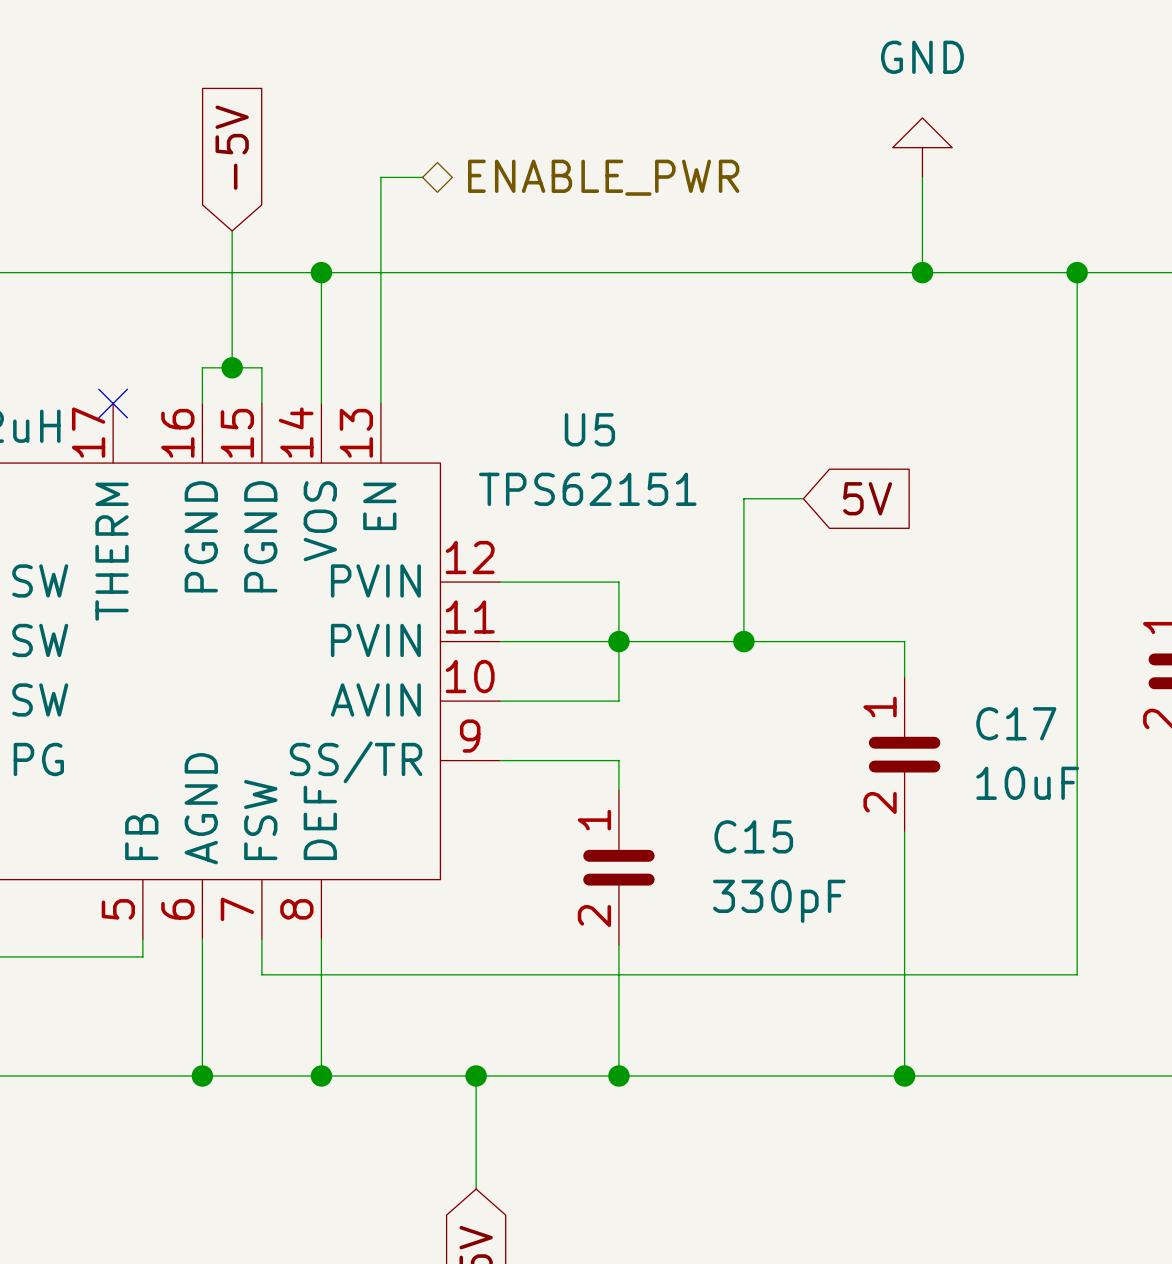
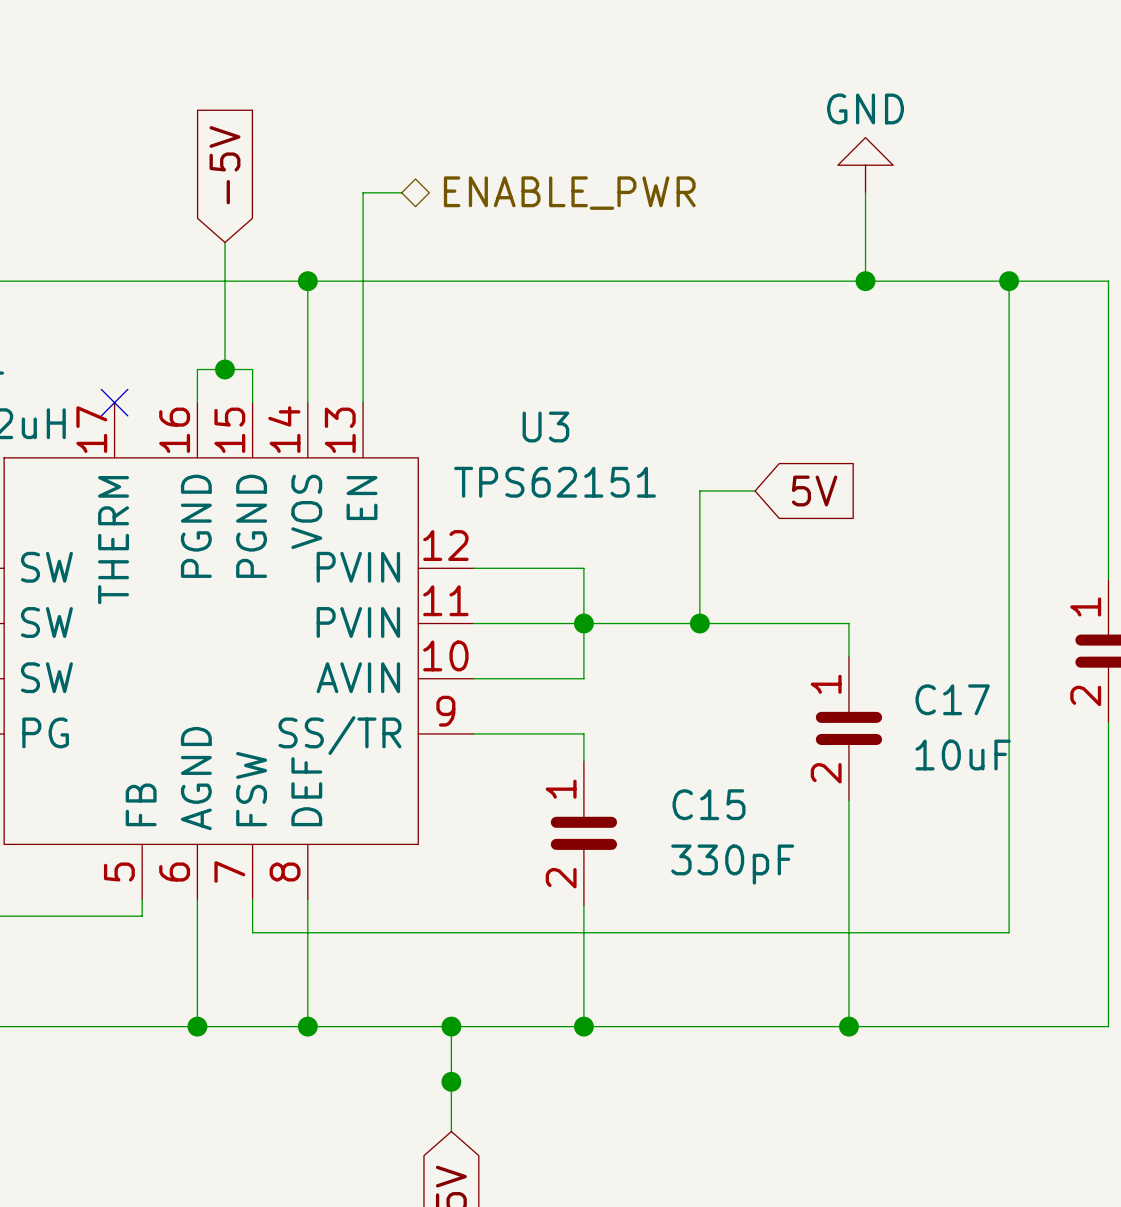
power symbol text position: GND (922, 57) -> GND (865, 108)
U5 name: U5 (589, 429) -> U3 (545, 427)
junction: none -> (451, 1081)

